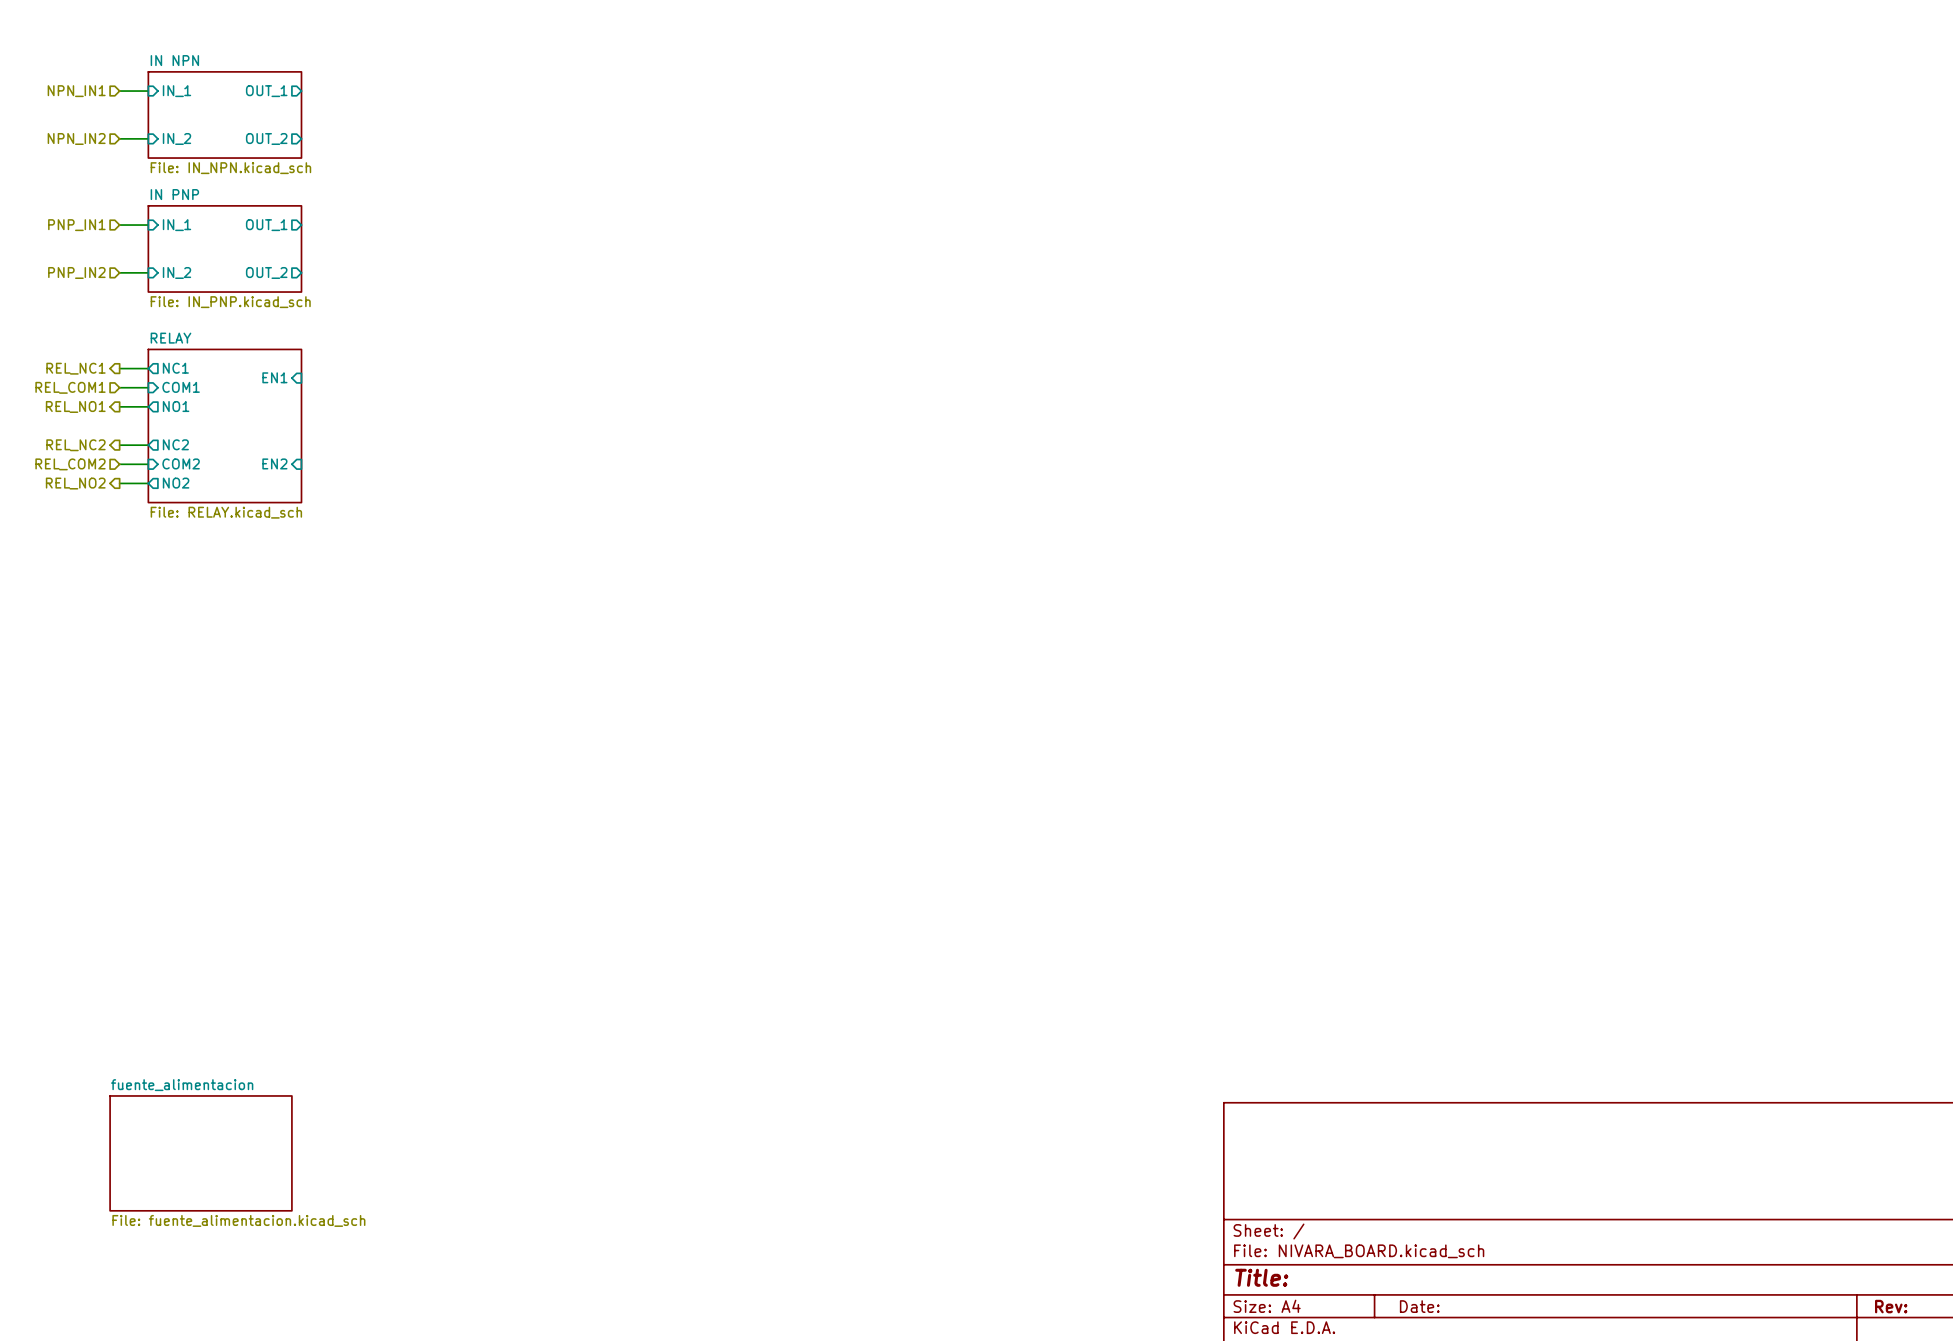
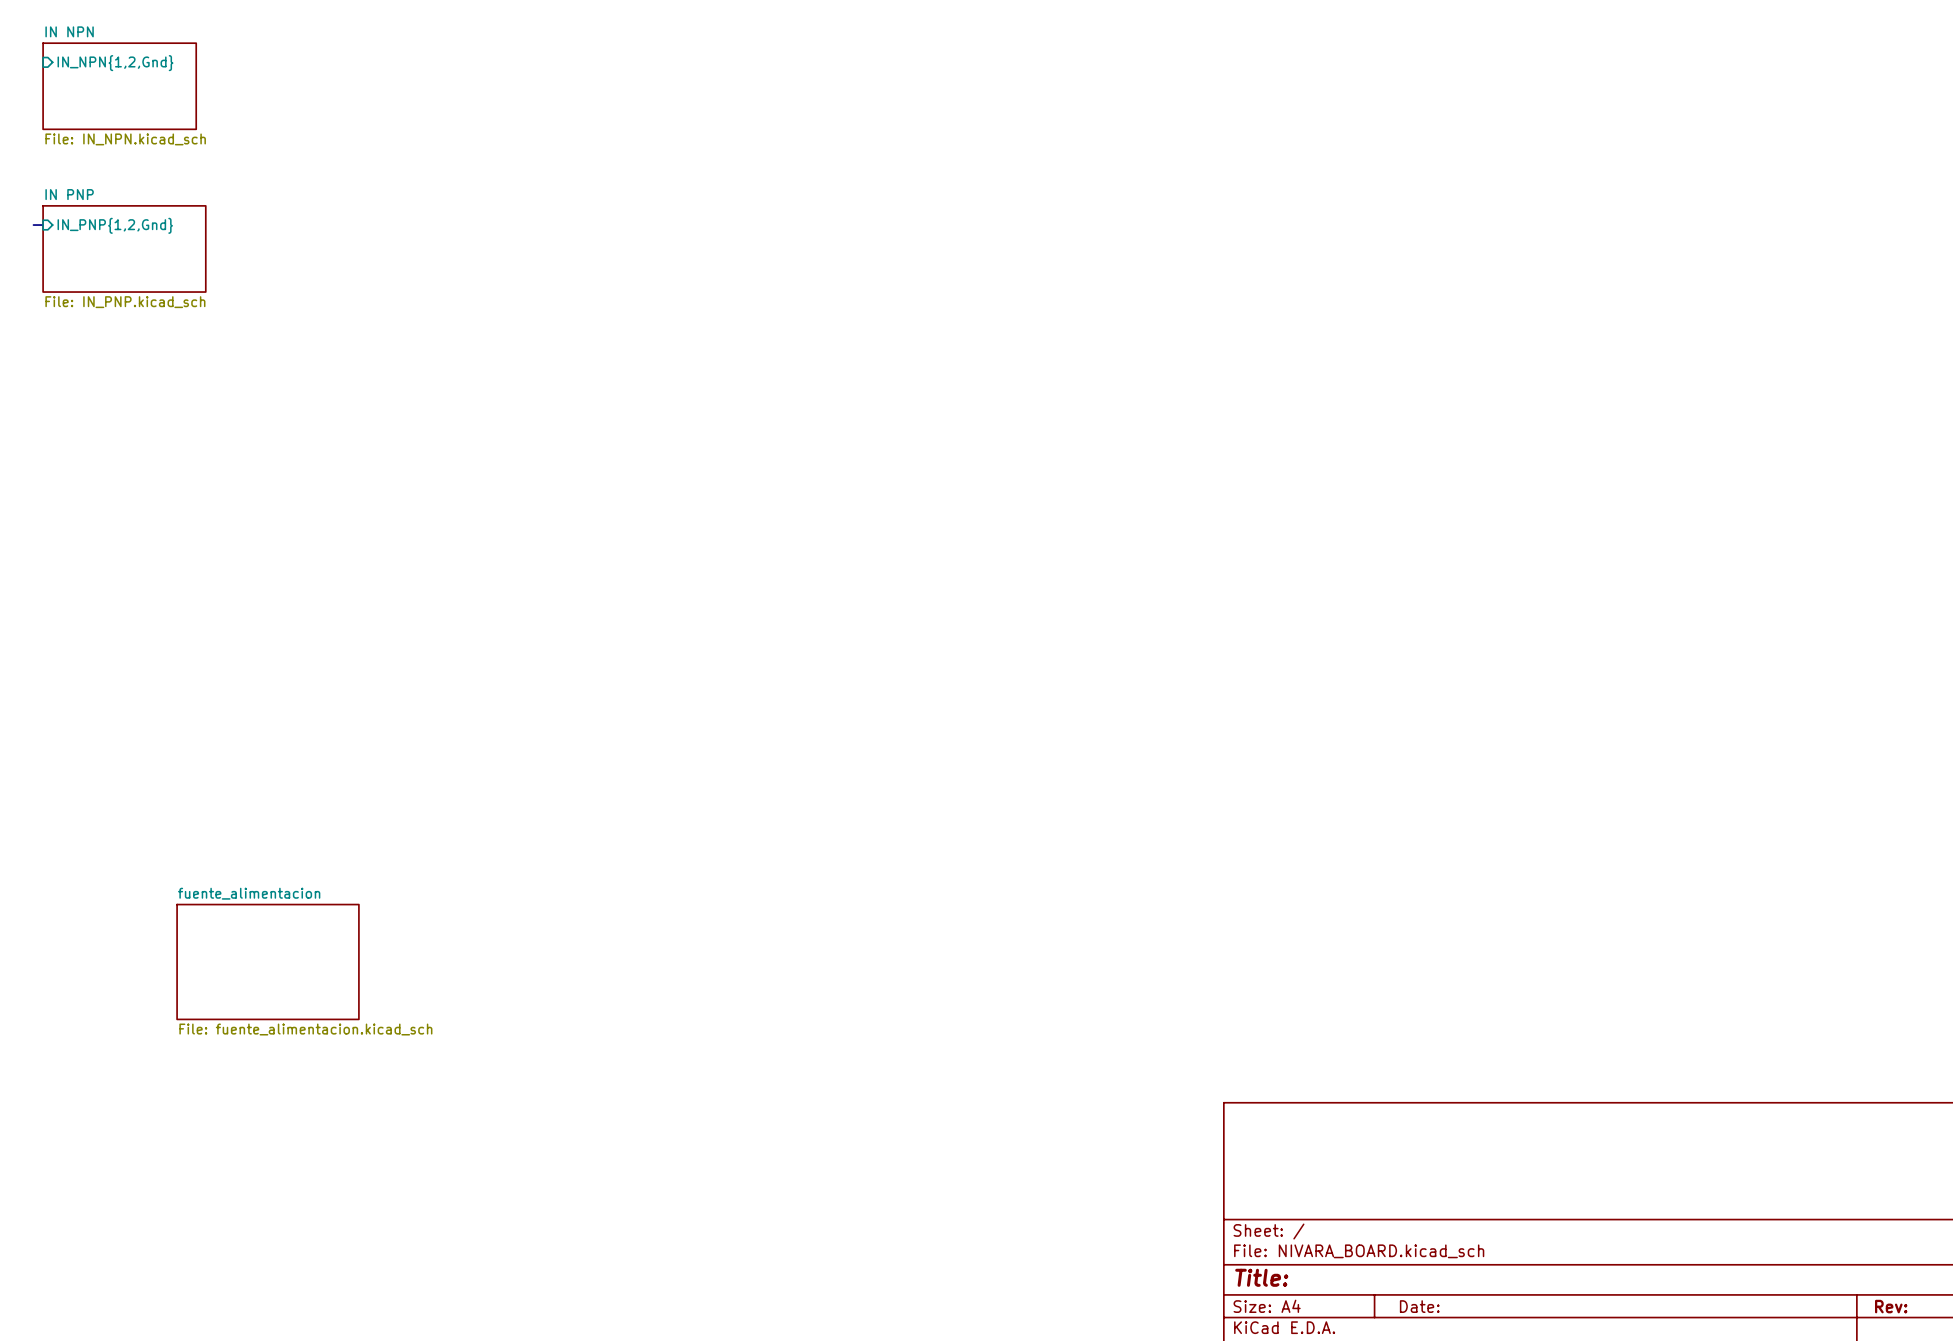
sheet pin: none -> IN_NPN{1,2,Gnd} (115, 63)
hierarchical label: NPN_IN1 (76, 91) -> none
wire: (119, 91) (148, 91) -> none
sheet pin: IN_1 (176, 91) -> none
sheet pin: OUT_1 (266, 91) -> none
sheet IN NPN position: (224, 114) -> (119, 86)
hierarchical label: NPN_IN2 (76, 138) -> none
wire: (119, 138) (148, 138) -> none
sheet pin: IN_2 (176, 138) -> none
sheet pin: OUT_2 (266, 138) -> none
bus: none -> (33, 225) (43, 225)
hierarchical label: PNP_IN1 (76, 225) -> none
sheet pin: none -> IN_PNP{1,2,Gnd} (115, 225)
wire: (119, 225) (148, 225) -> none
sheet pin: IN_1 (176, 225) -> none
sheet pin: OUT_1 (266, 225) -> none
sheet IN PNP: none -> File: IN_PNP.kicad_sch (124, 248)
sheet IN PNP: File: IN_PNP.kicad_sch (224, 248) -> none
hierarchical label: PNP_IN2 (76, 272) -> none
wire: (119, 272) (148, 272) -> none
sheet pin: IN_2 (176, 272) -> none
sheet pin: OUT_2 (266, 272) -> none
hierarchical label: REL_NC1 (75, 368) -> none
wire: (119, 368) (148, 368) -> none
sheet pin: NC1 (175, 368) -> none
sheet pin: EN1 (274, 377) -> none
hierarchical label: REL_COM1 (70, 387) -> none
wire: (119, 387) (148, 387) -> none
sheet pin: COM1 (181, 387) -> none
hierarchical label: REL_NO1 (75, 406) -> none
wire: (119, 406) (148, 406) -> none
sheet pin: NO1 (176, 406) -> none
sheet RELAY: File: RELAY.kicad_sch (224, 426) -> none
sheet pin: NC2 (175, 444) -> none
hierarchical label: REL_NC2 (75, 445) -> none
wire: (119, 445) (148, 445) -> none
sheet pin: COM2 (181, 463) -> none
sheet pin: EN2 (274, 463) -> none
hierarchical label: REL_COM2 (70, 464) -> none
wire: (119, 464) (148, 464) -> none
hierarchical label: REL_NO2 (75, 483) -> none
wire: (119, 483) (148, 483) -> none
sheet pin: NO2 (176, 483) -> none
sheet fuente_alimentacion: none -> File: fuente_alimentacion.kicad_sch (267, 961)
sheet fuente_alimentacion: File: fuente_alimentacion.kicad_sch (201, 1153) -> none

